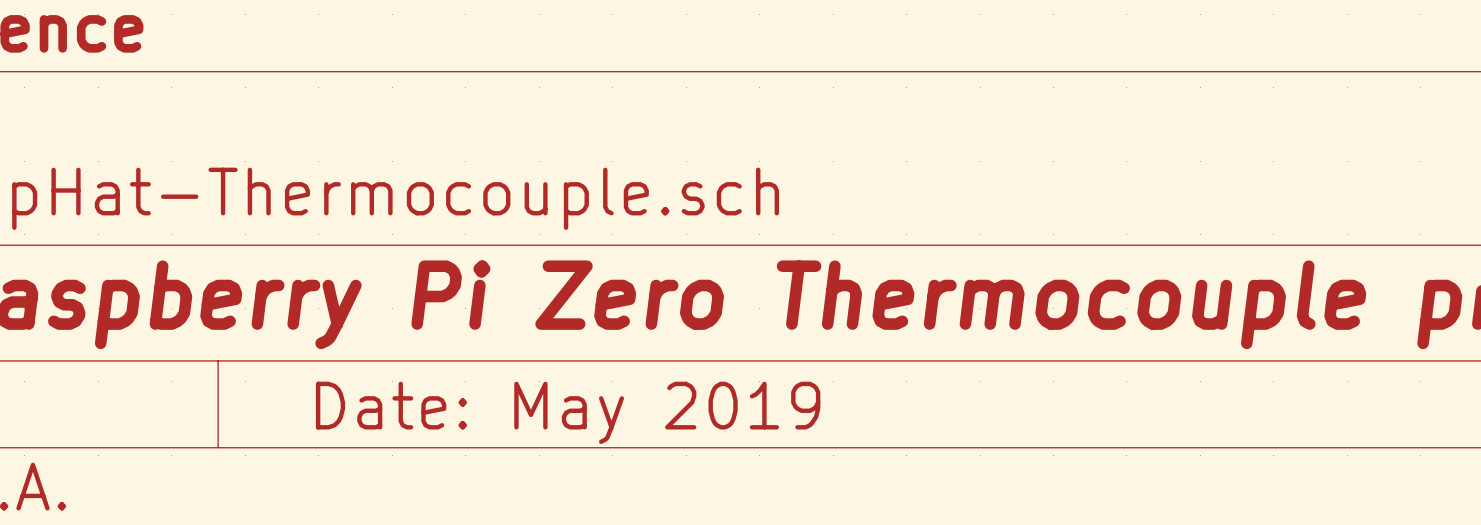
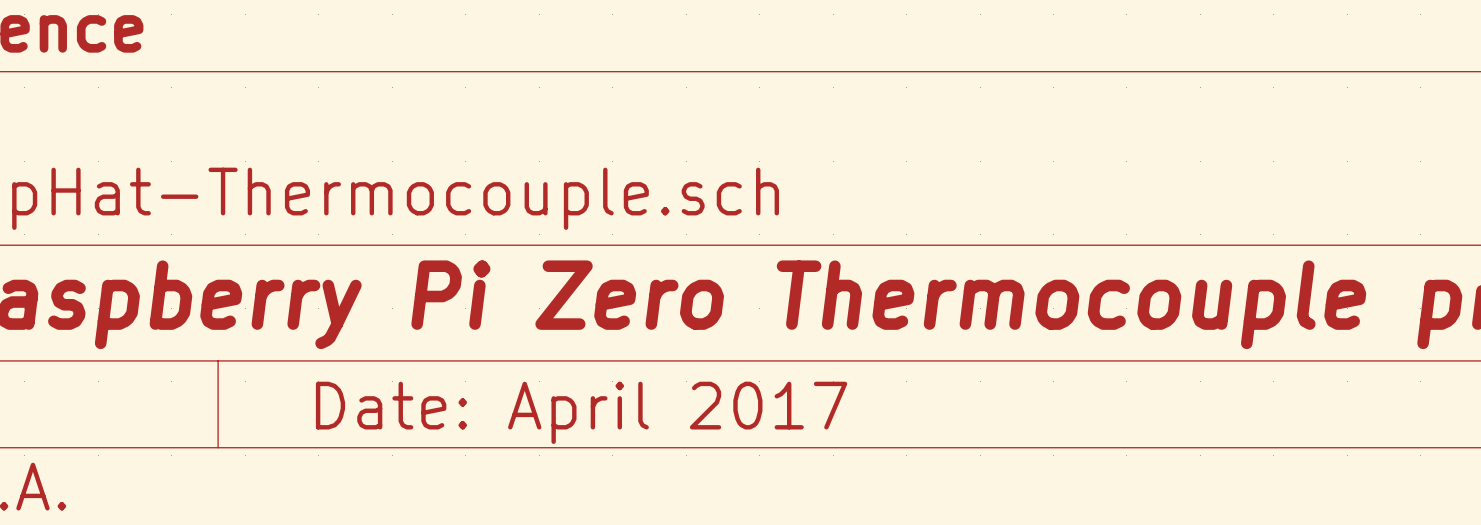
title block: Date: May 2019 (568, 412) -> Date: April 2017 (581, 412)

